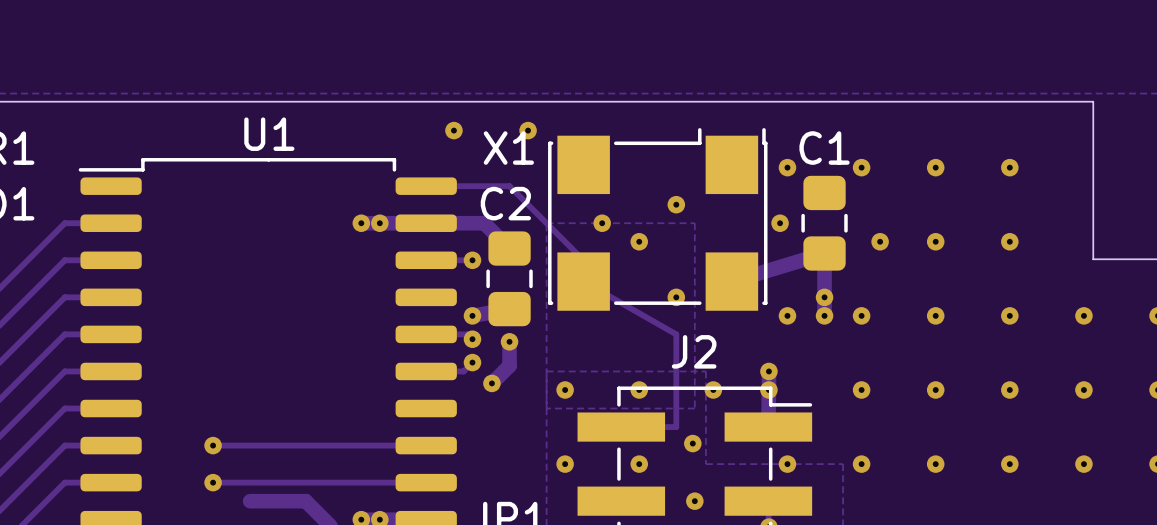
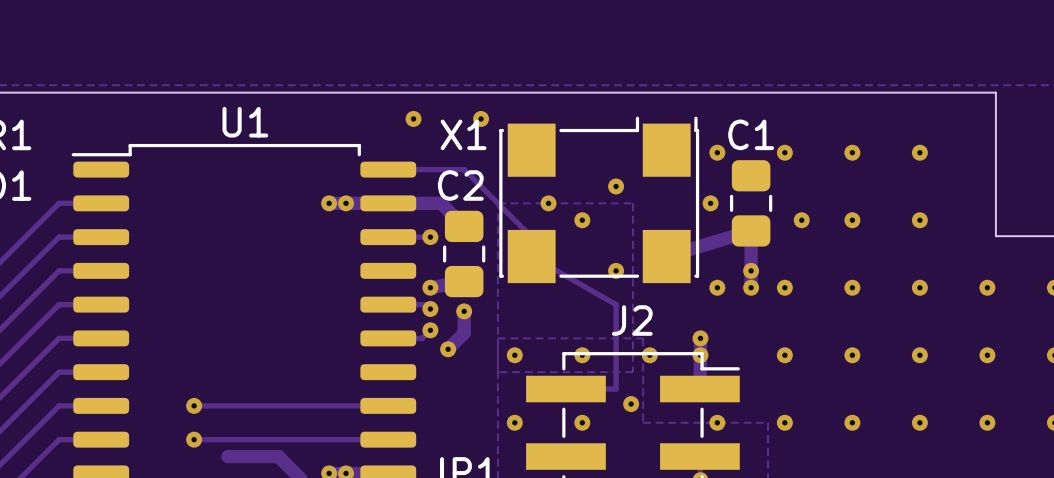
via: (694, 501) -> none

